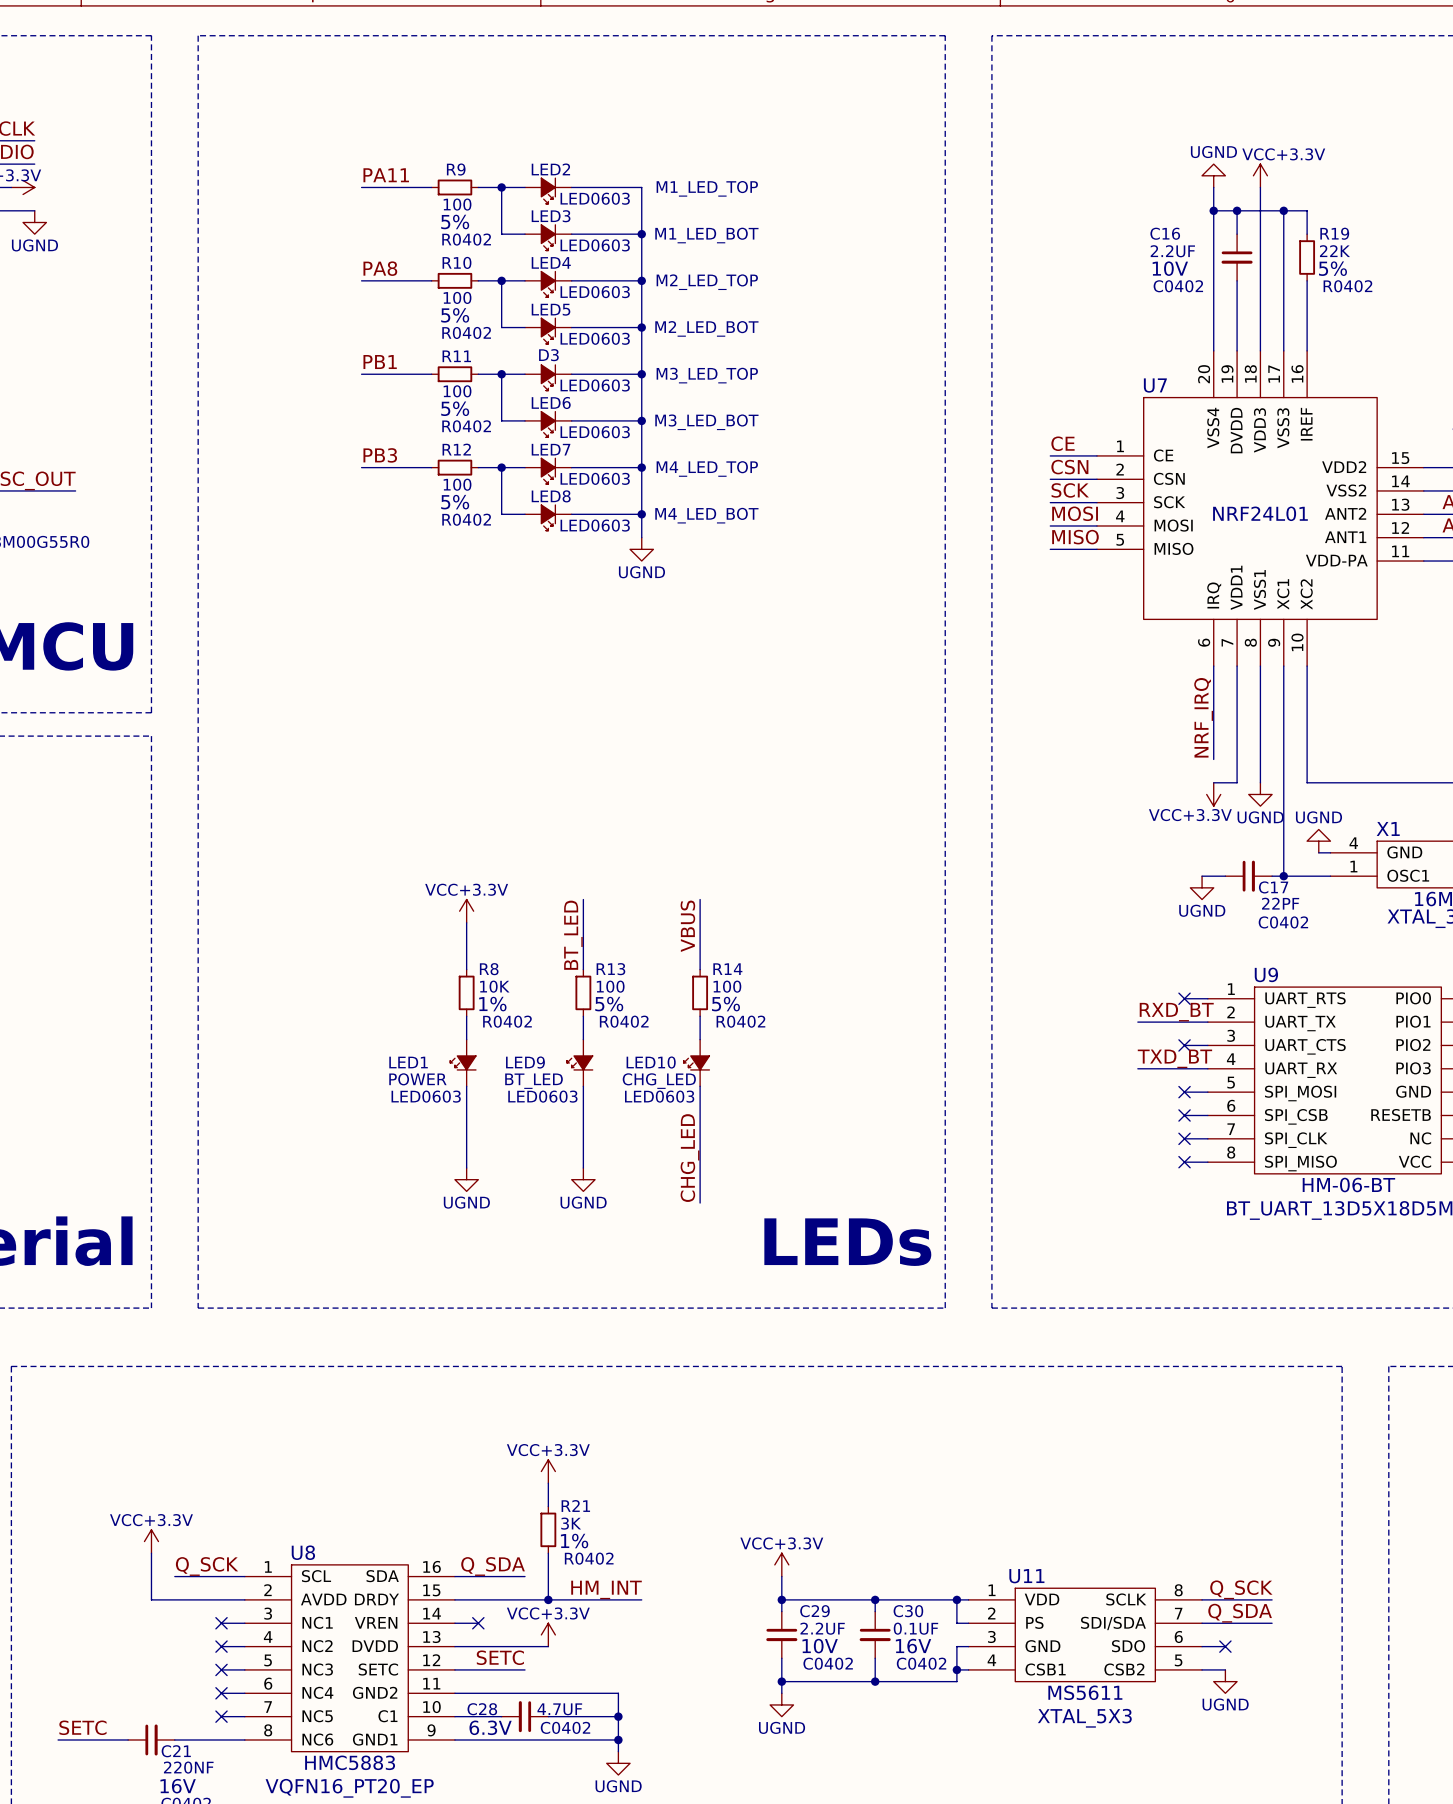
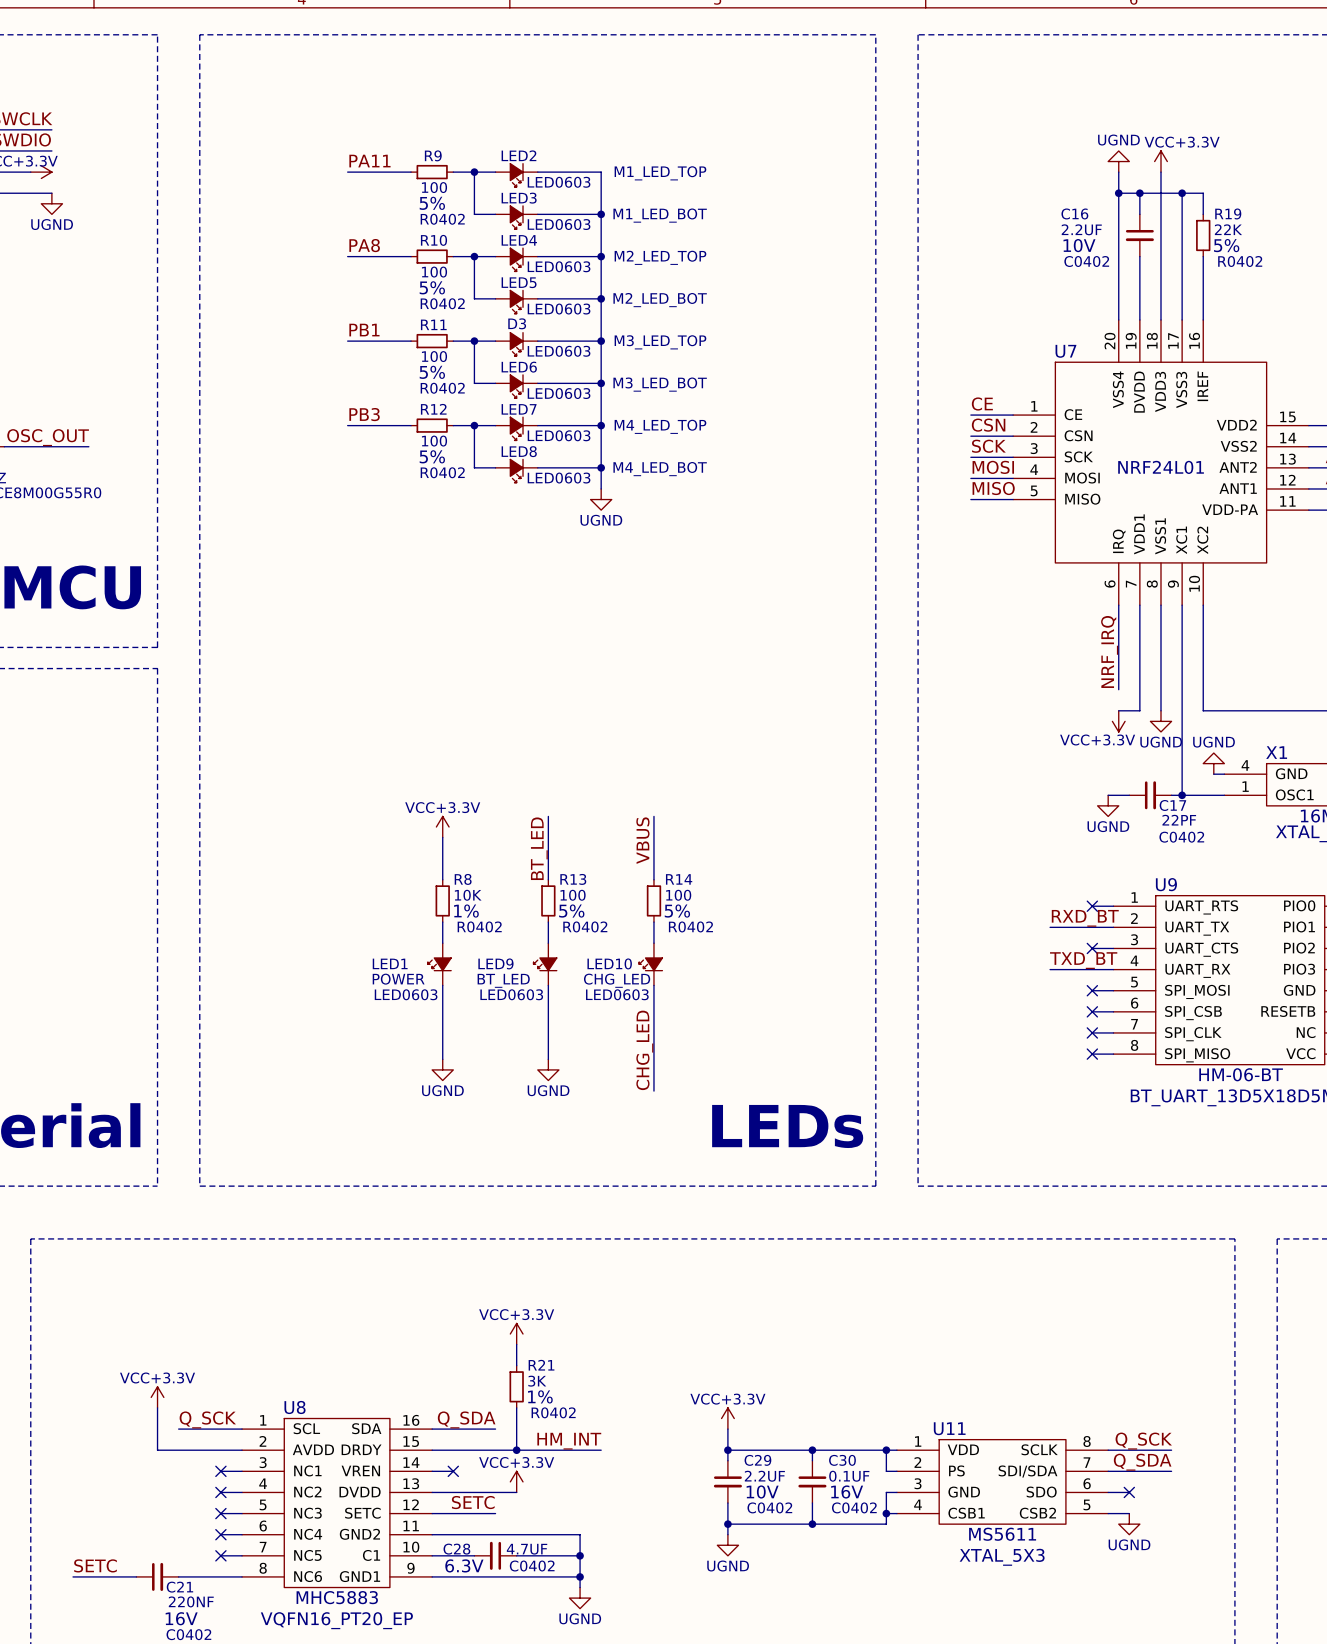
U8 value: HMC5883 (350, 1762) -> MHC5883 (337, 1597)

